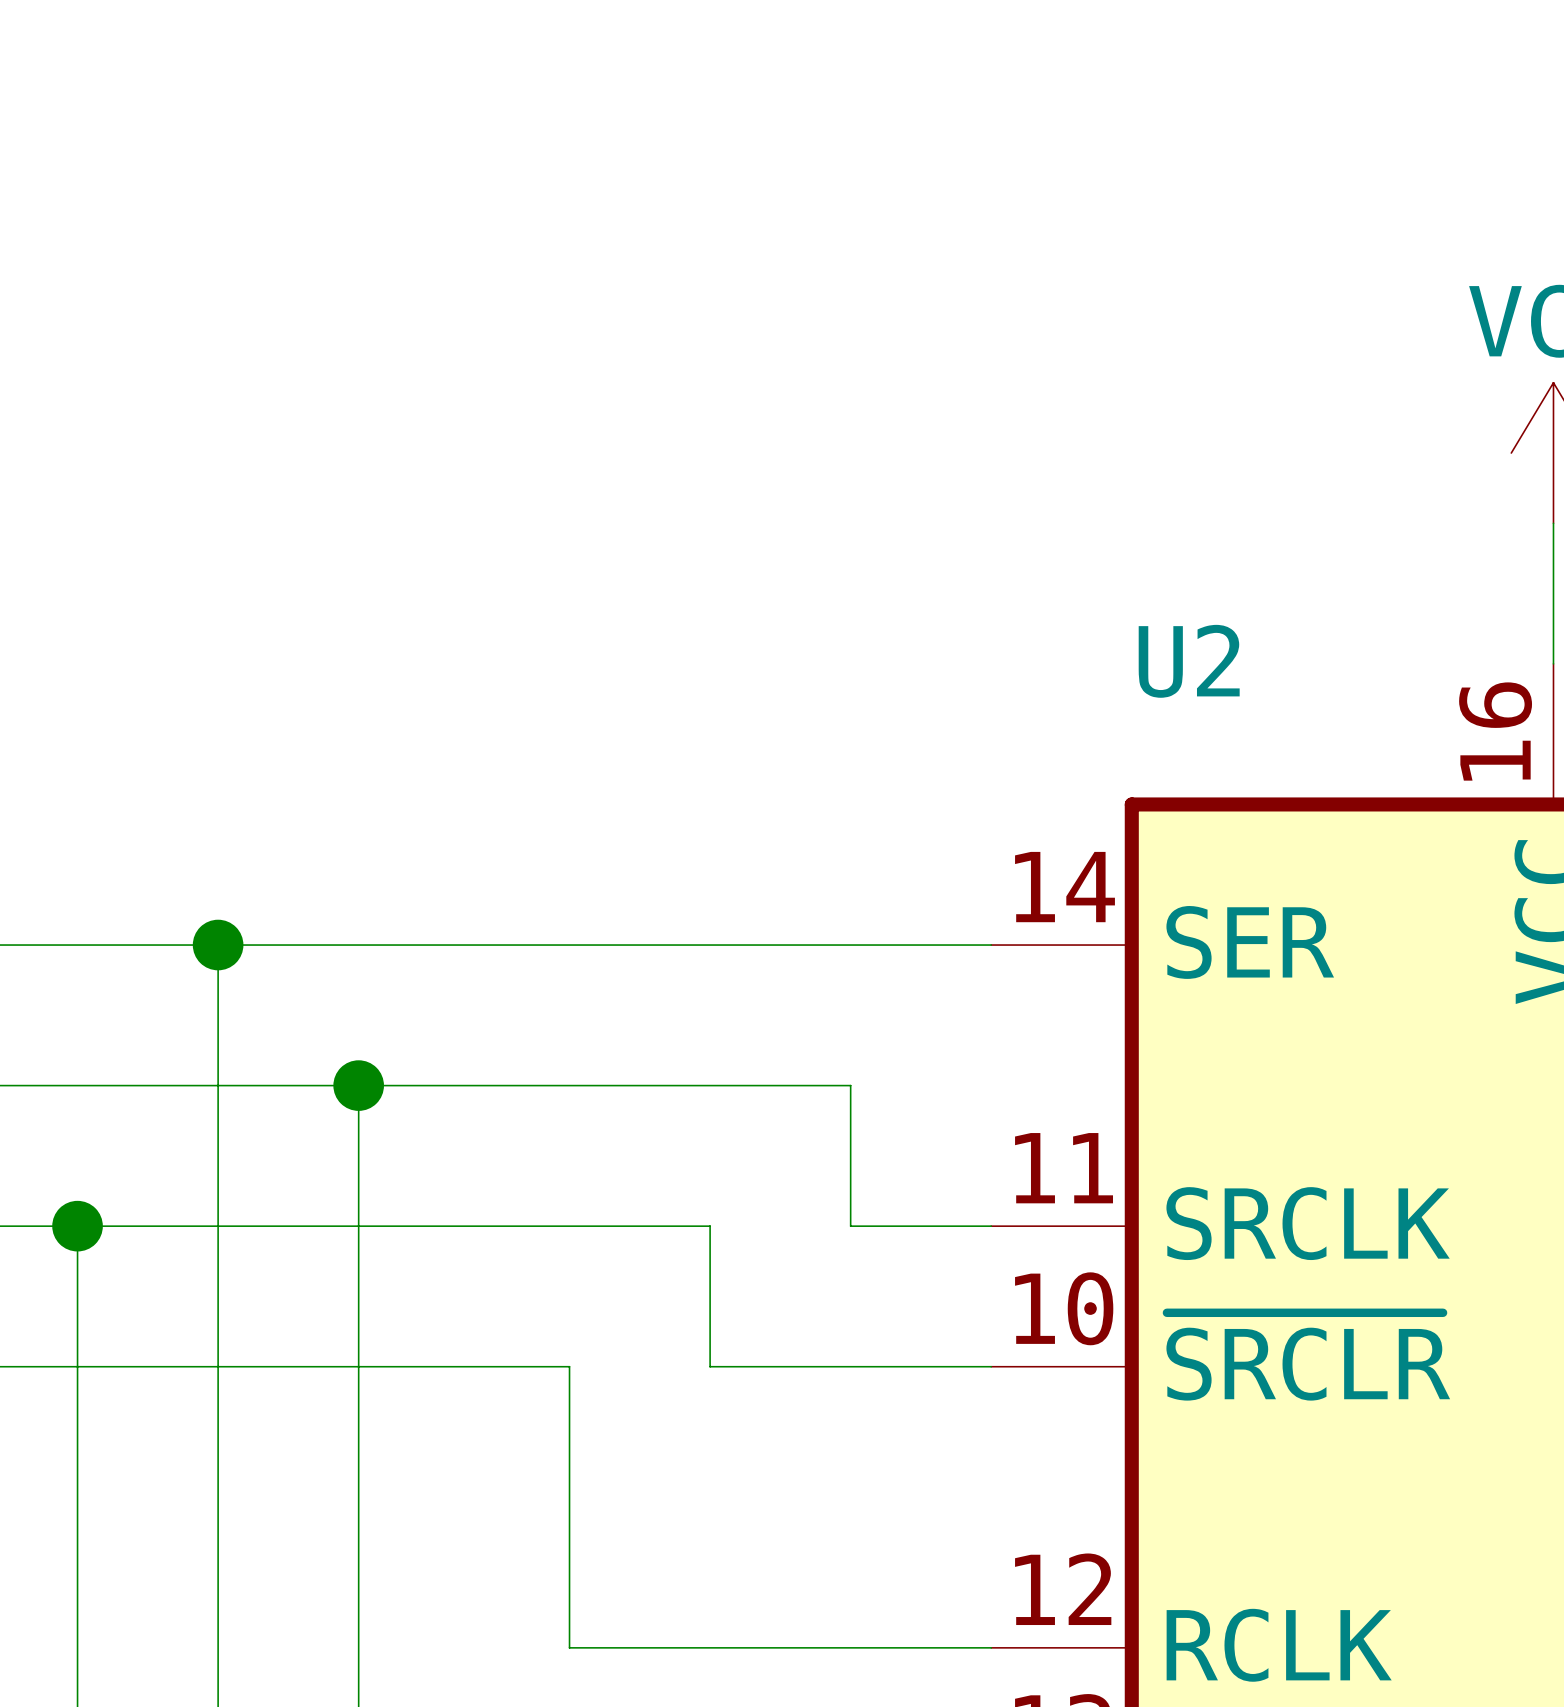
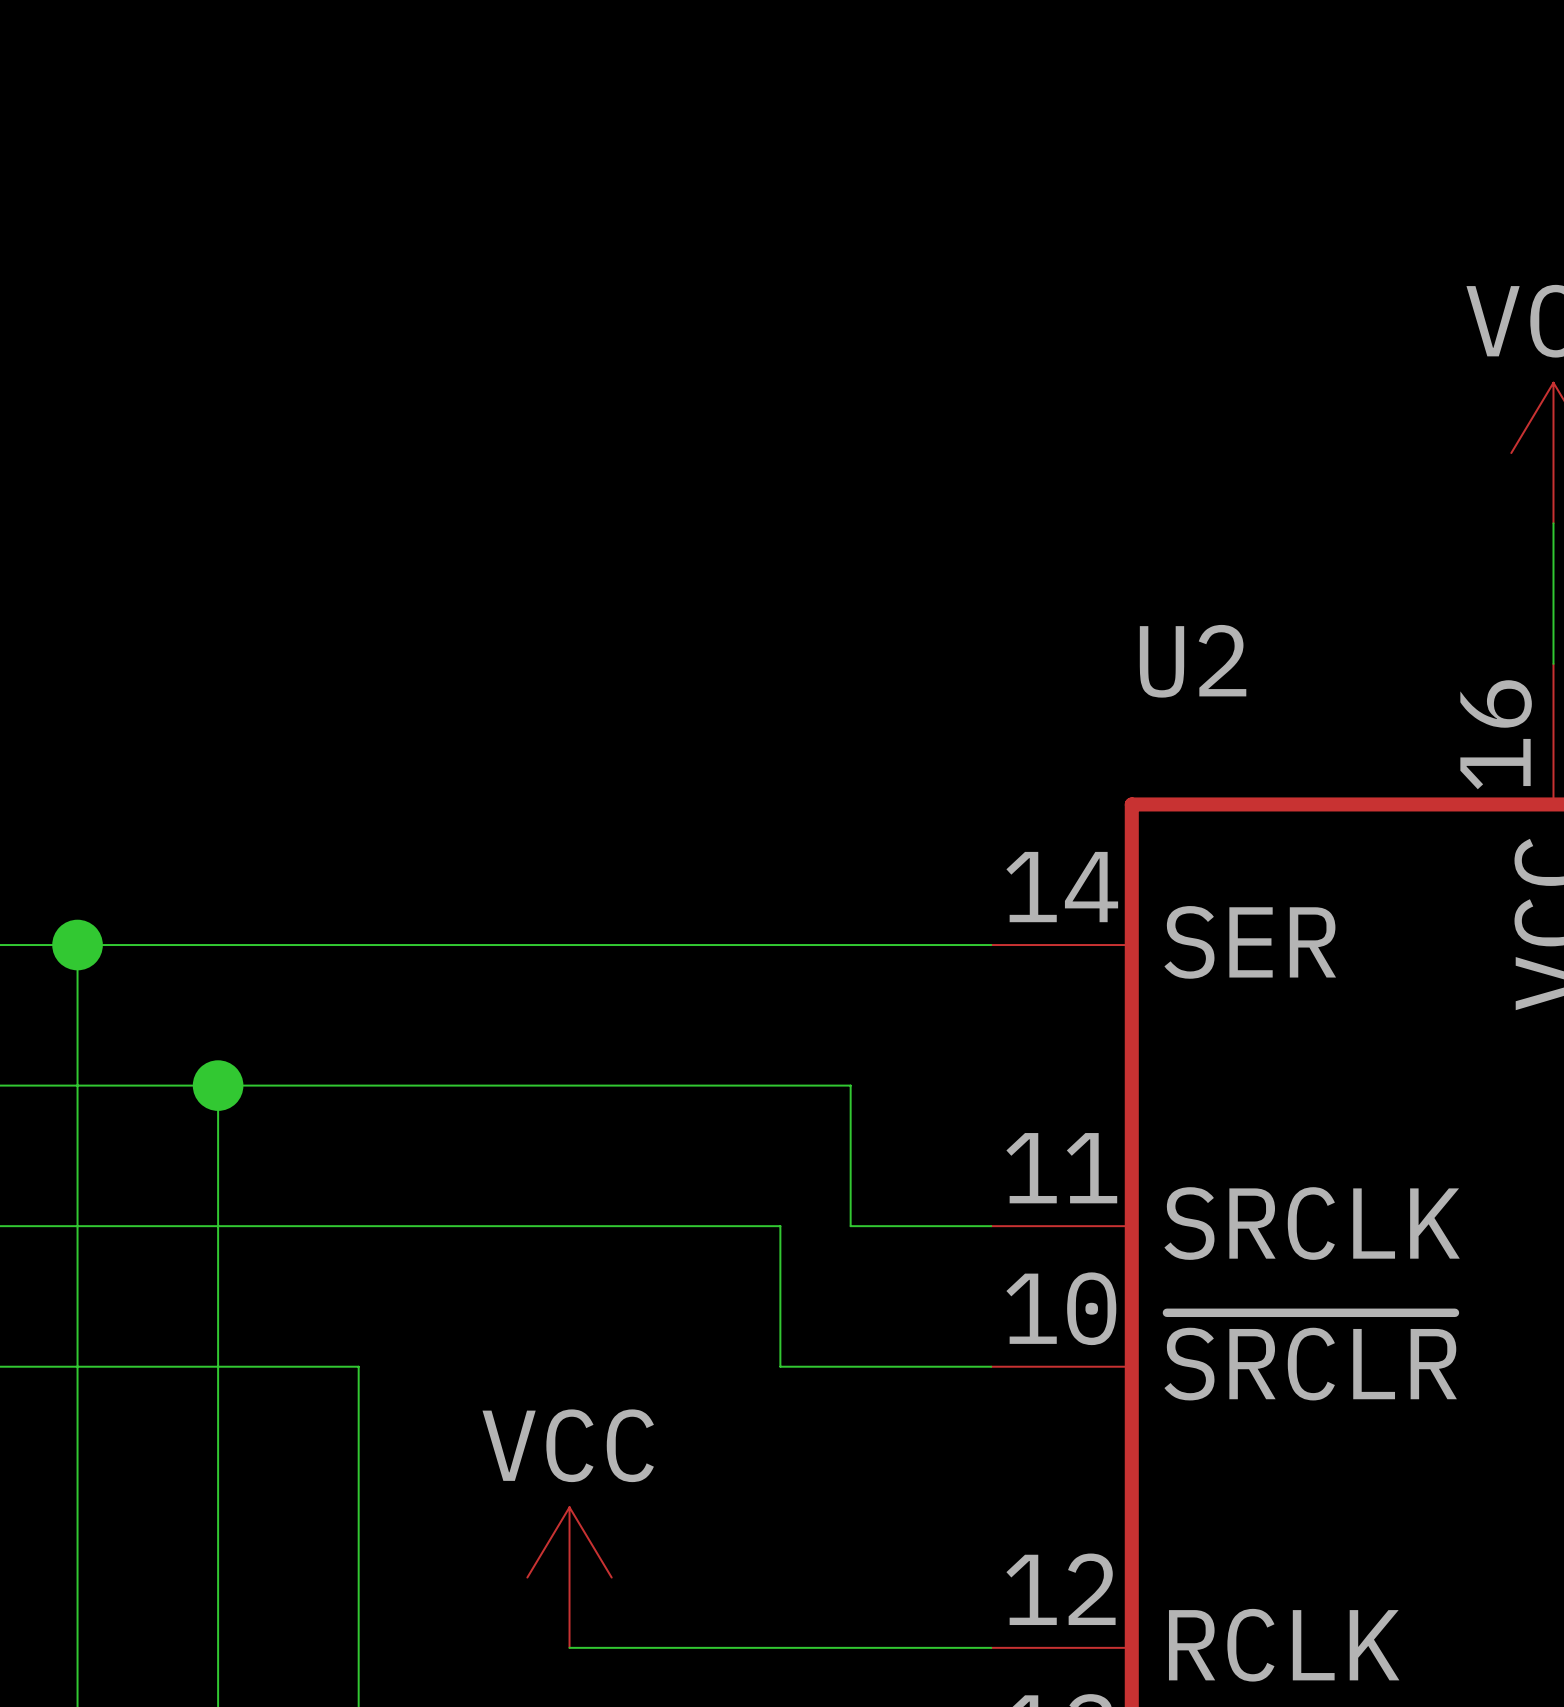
wire: none -> (77, 945) (77, 1226)
junction: none -> (77, 945)
wire: (218, 945) (218, 1085) -> none
junction: (218, 945) -> none
junction: none -> (218, 1085)
wire: (358, 1085) (358, 1366) (569, 1366) (569, 1647) -> none
junction: (358, 1085) -> none
junction: (77, 1226) -> none
wire: (710, 1226) (710, 1366) (780, 1366) -> (710, 1226) (780, 1226) (780, 1366)
power symbol: none -> VCC (569, 1577)

